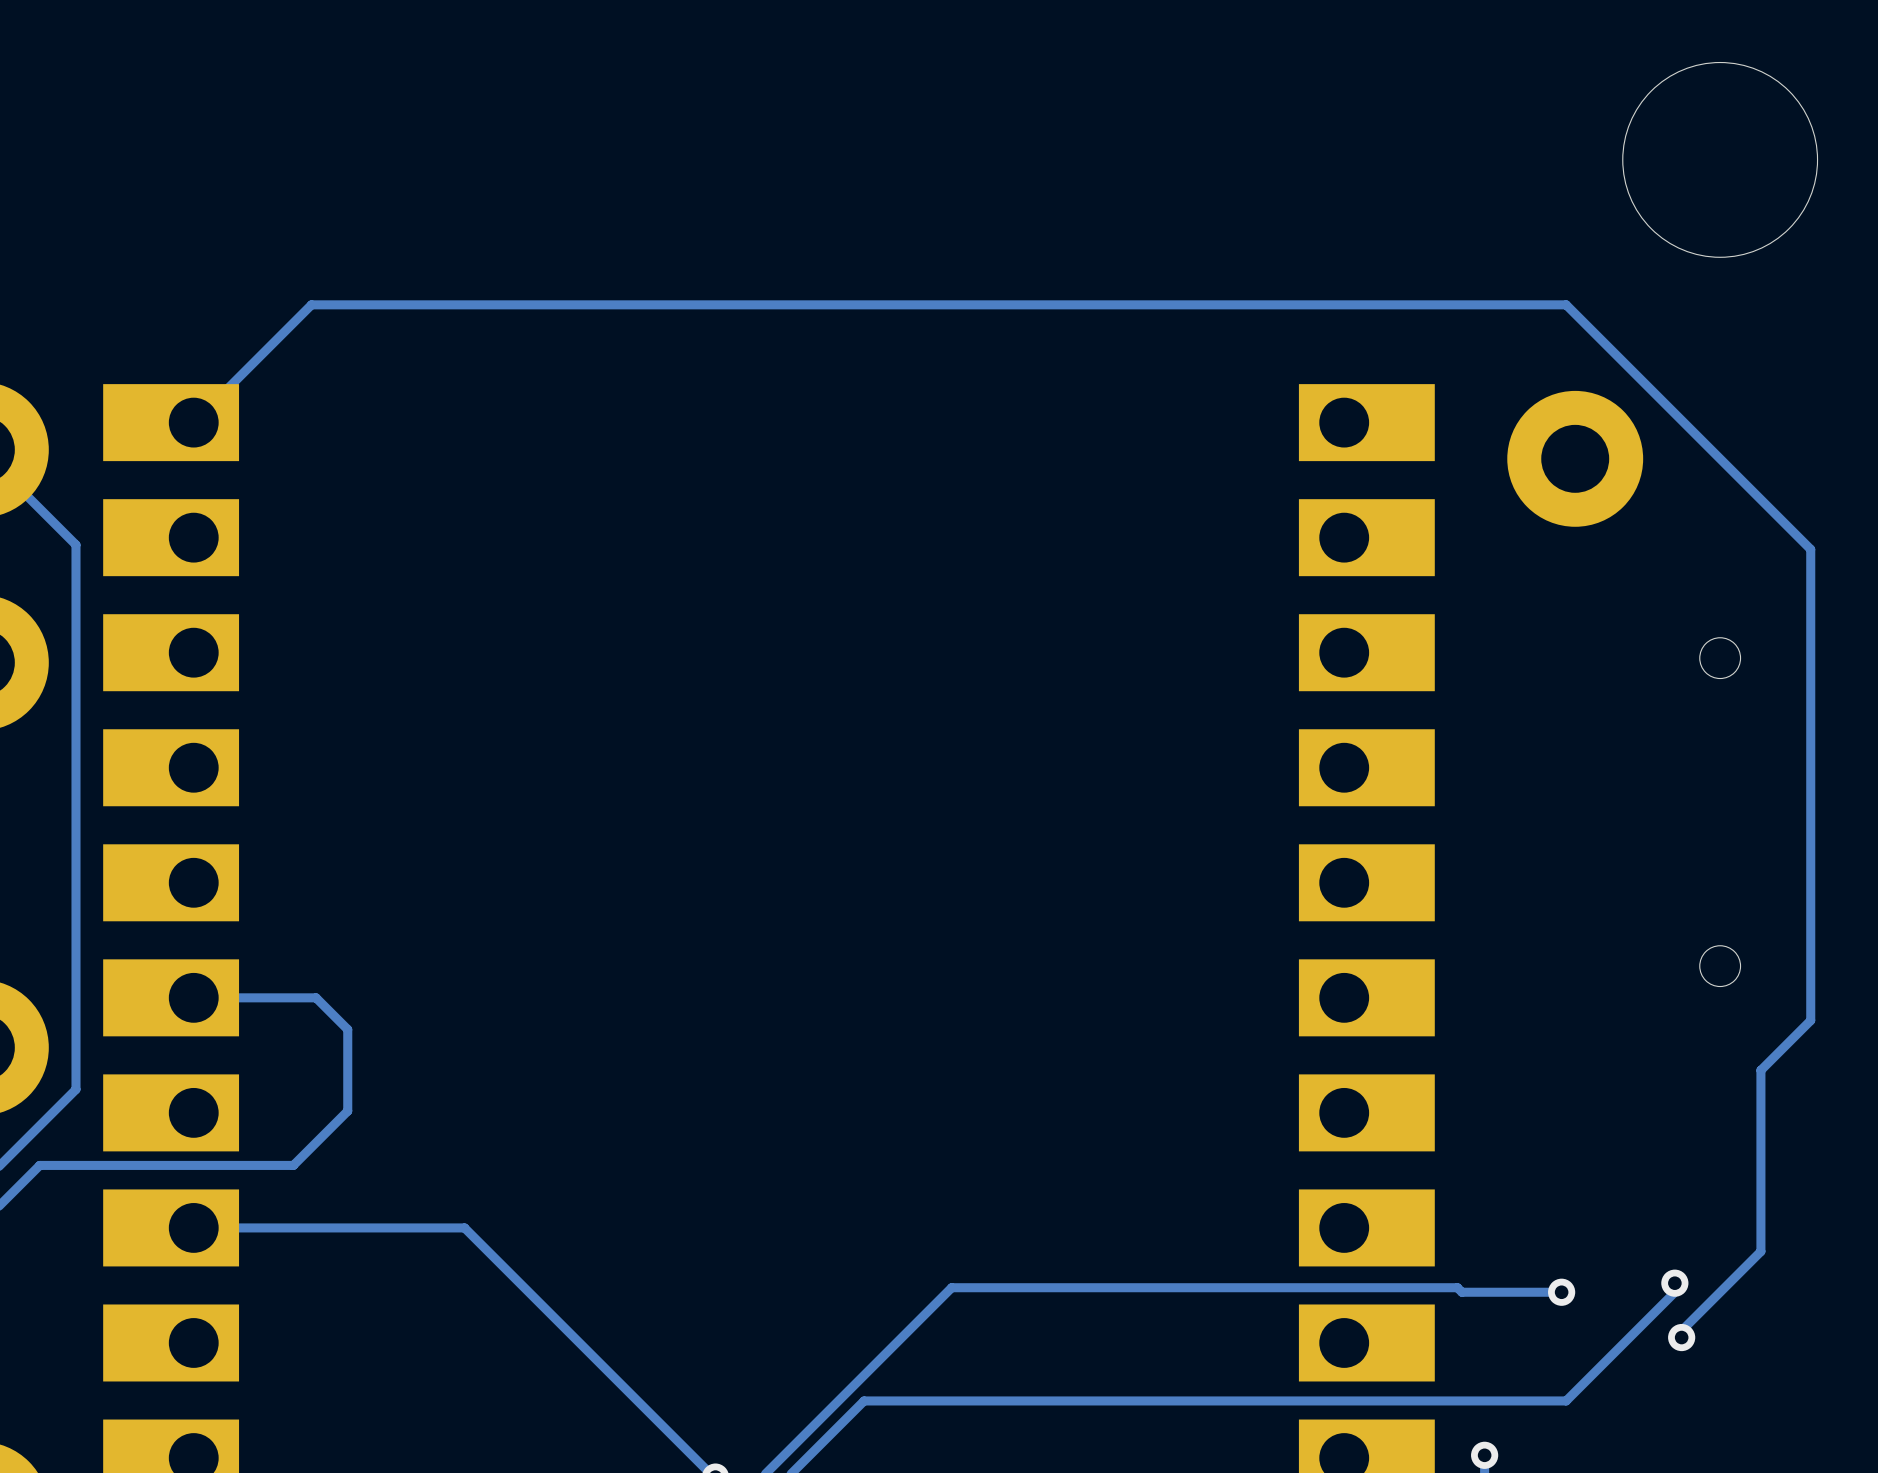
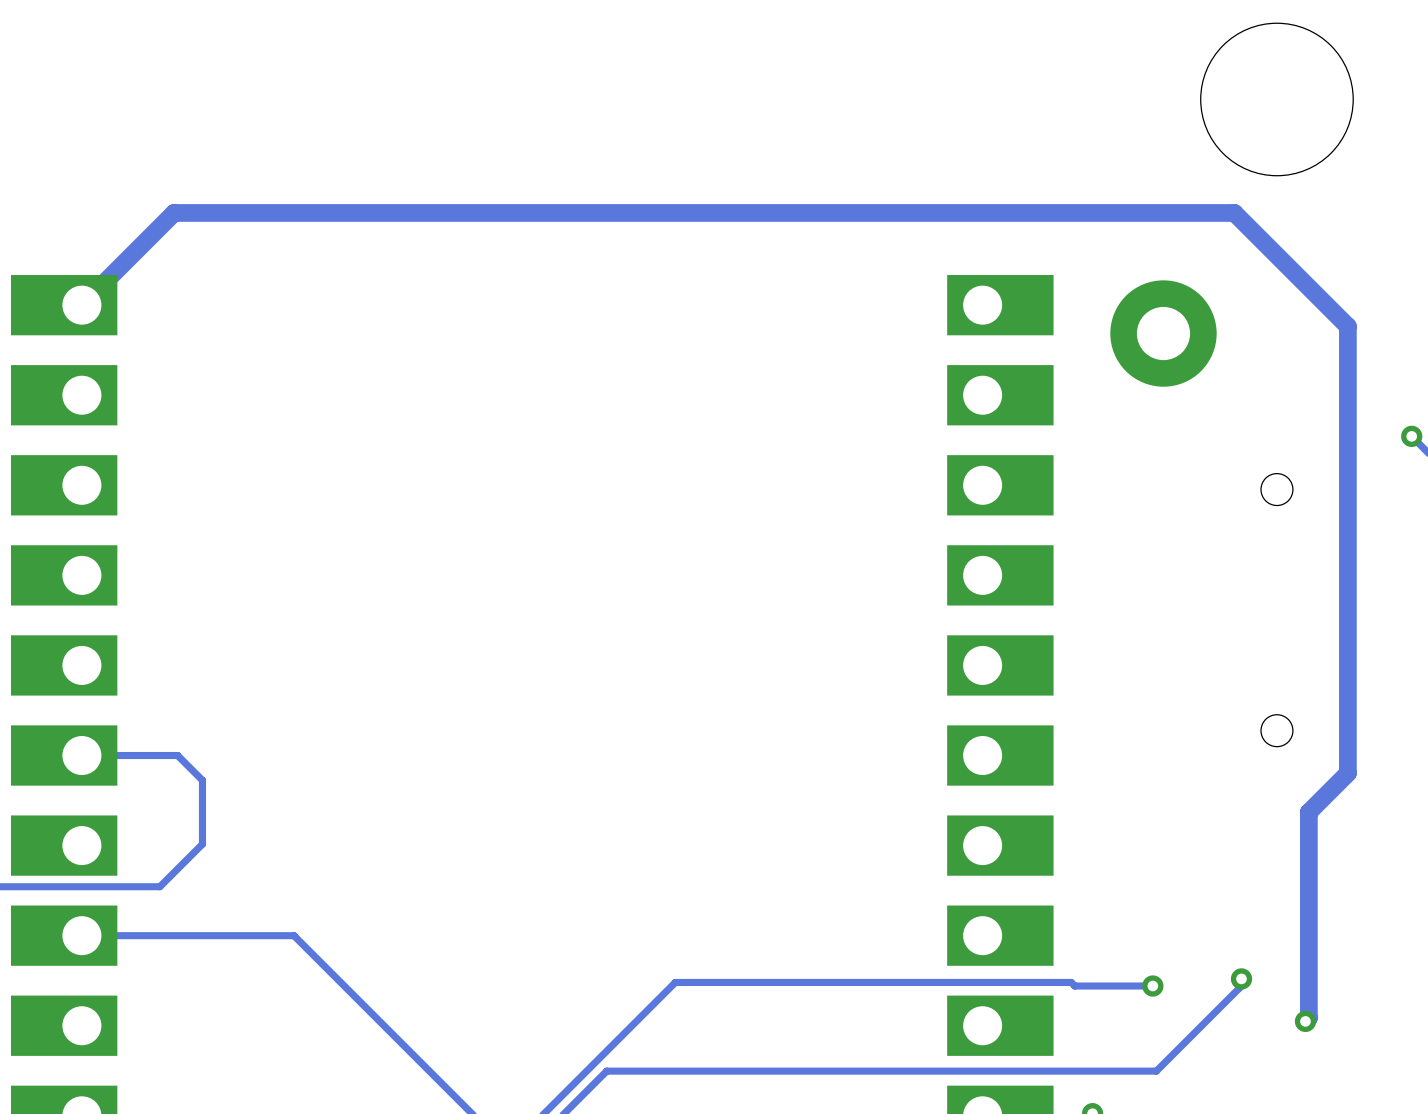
track: (1566, 304) (1810, 549) -> (1156, 212) (1234, 212) (1347, 326) (1347, 404)
track width: thin (1566, 304) (311, 304) (193, 422) -> thick (1156, 212) (174, 212) (81, 305)
track width: thin (1810, 549) (1810, 1020) (1760, 1070) (1760, 1251) -> thick (1347, 404) (1347, 773) (1308, 812) (1308, 954)
track: (1760, 1251) (1681, 1330) (1681, 1337) -> (1308, 954) (1308, 1018) (1305, 1021)
via position: (1681, 1337) -> (1305, 1021)

